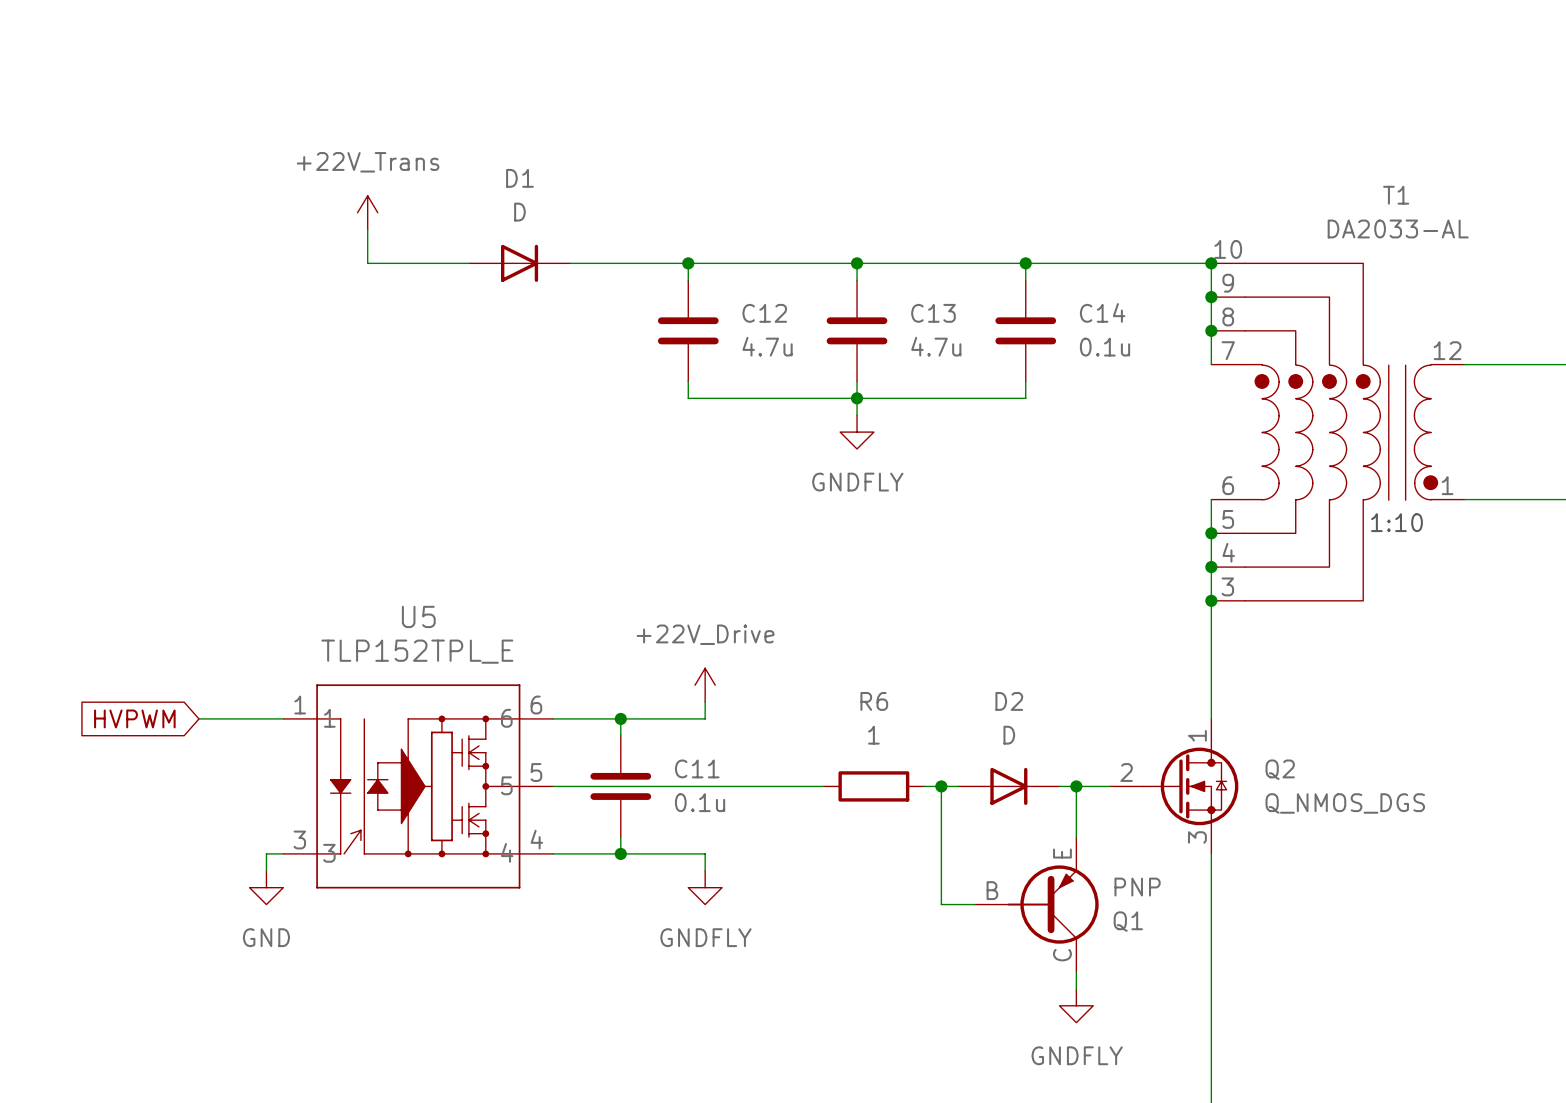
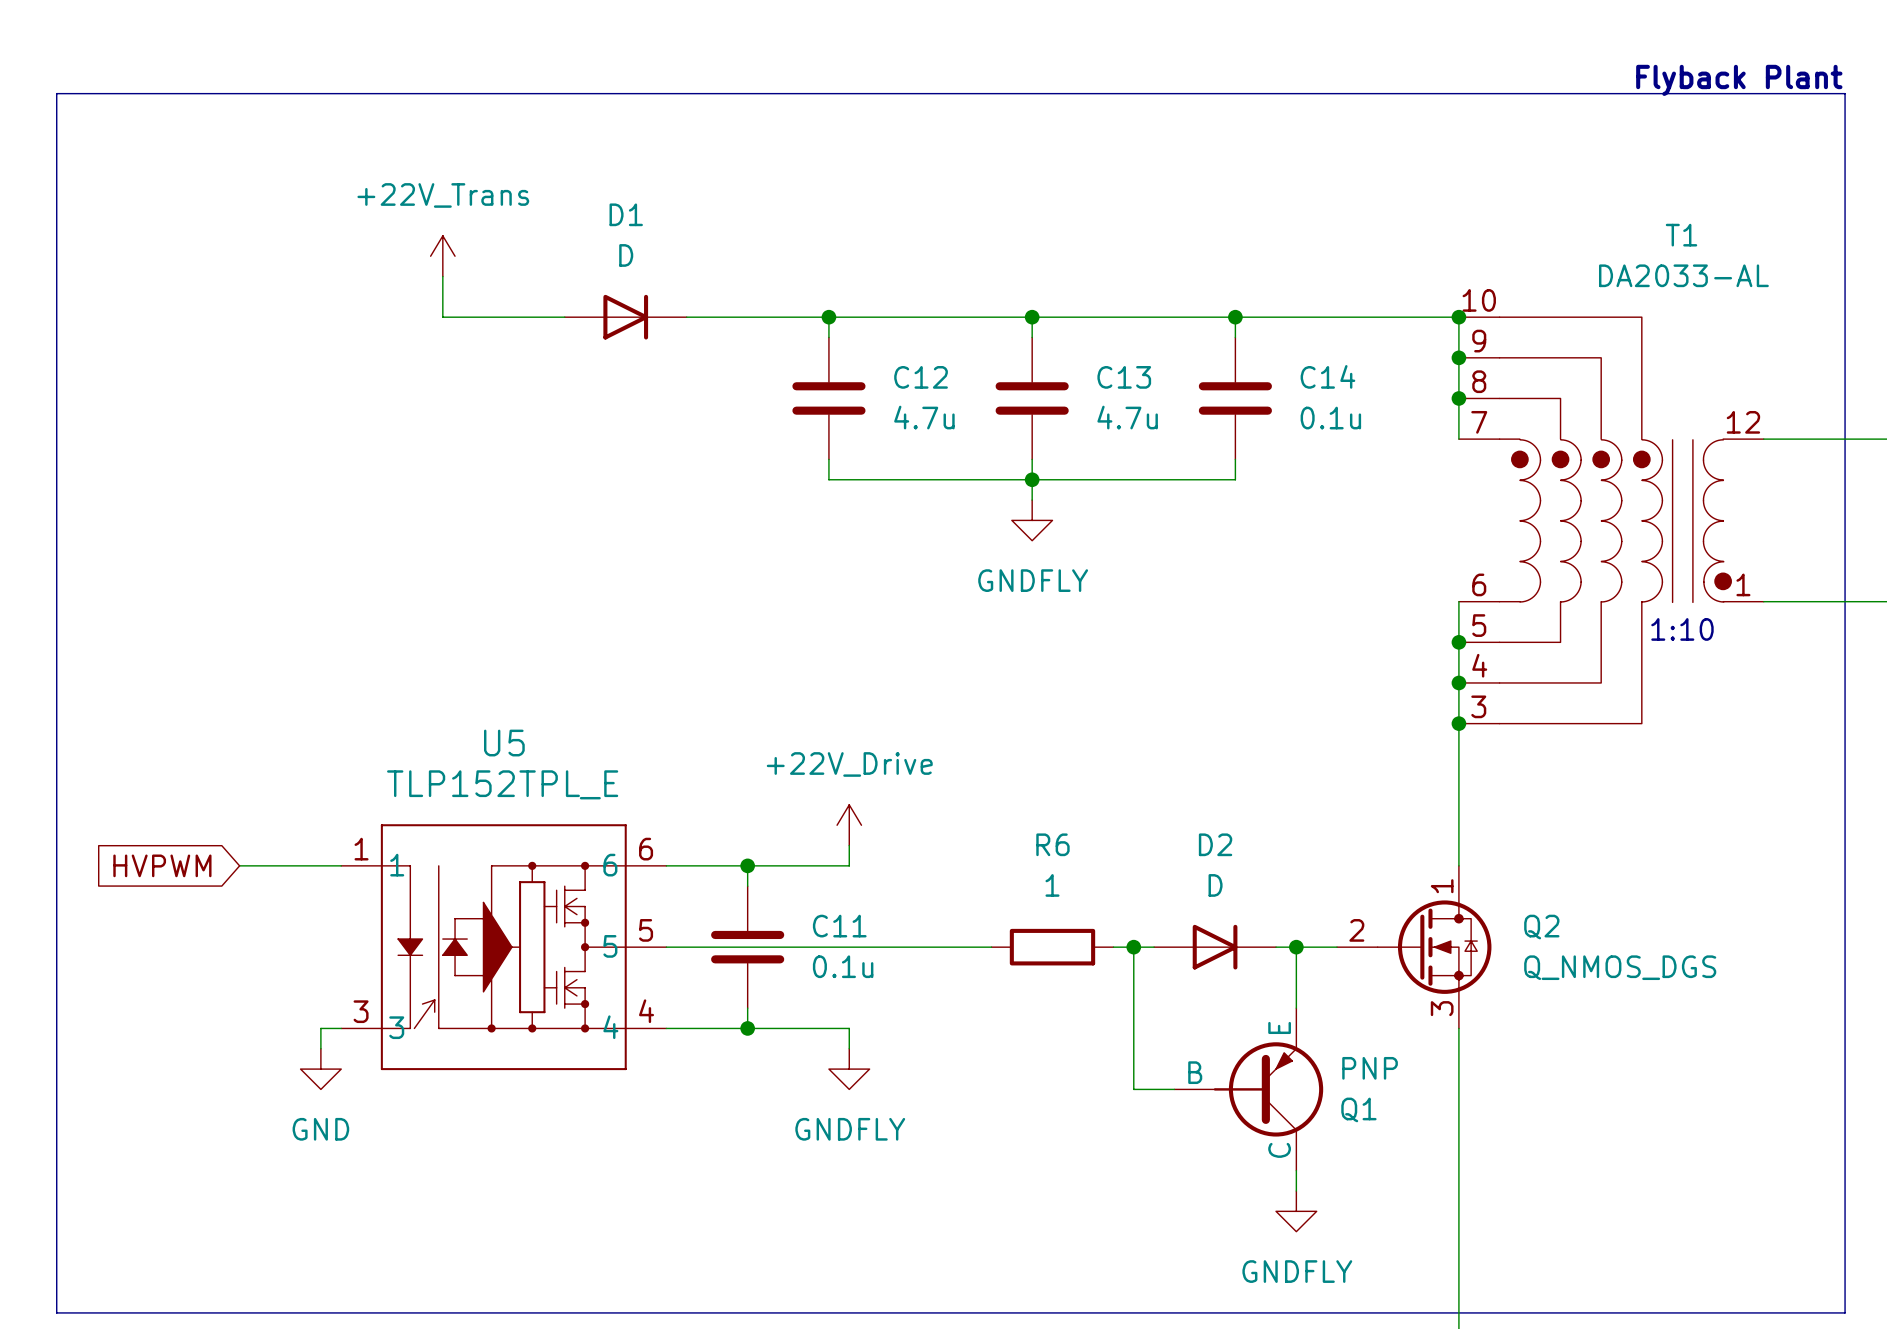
text: none -> Flyback Plant (1739, 80)
line: none -> (56, 93) (1845, 93) (1845, 1312) (56, 1312) (56, 93)

